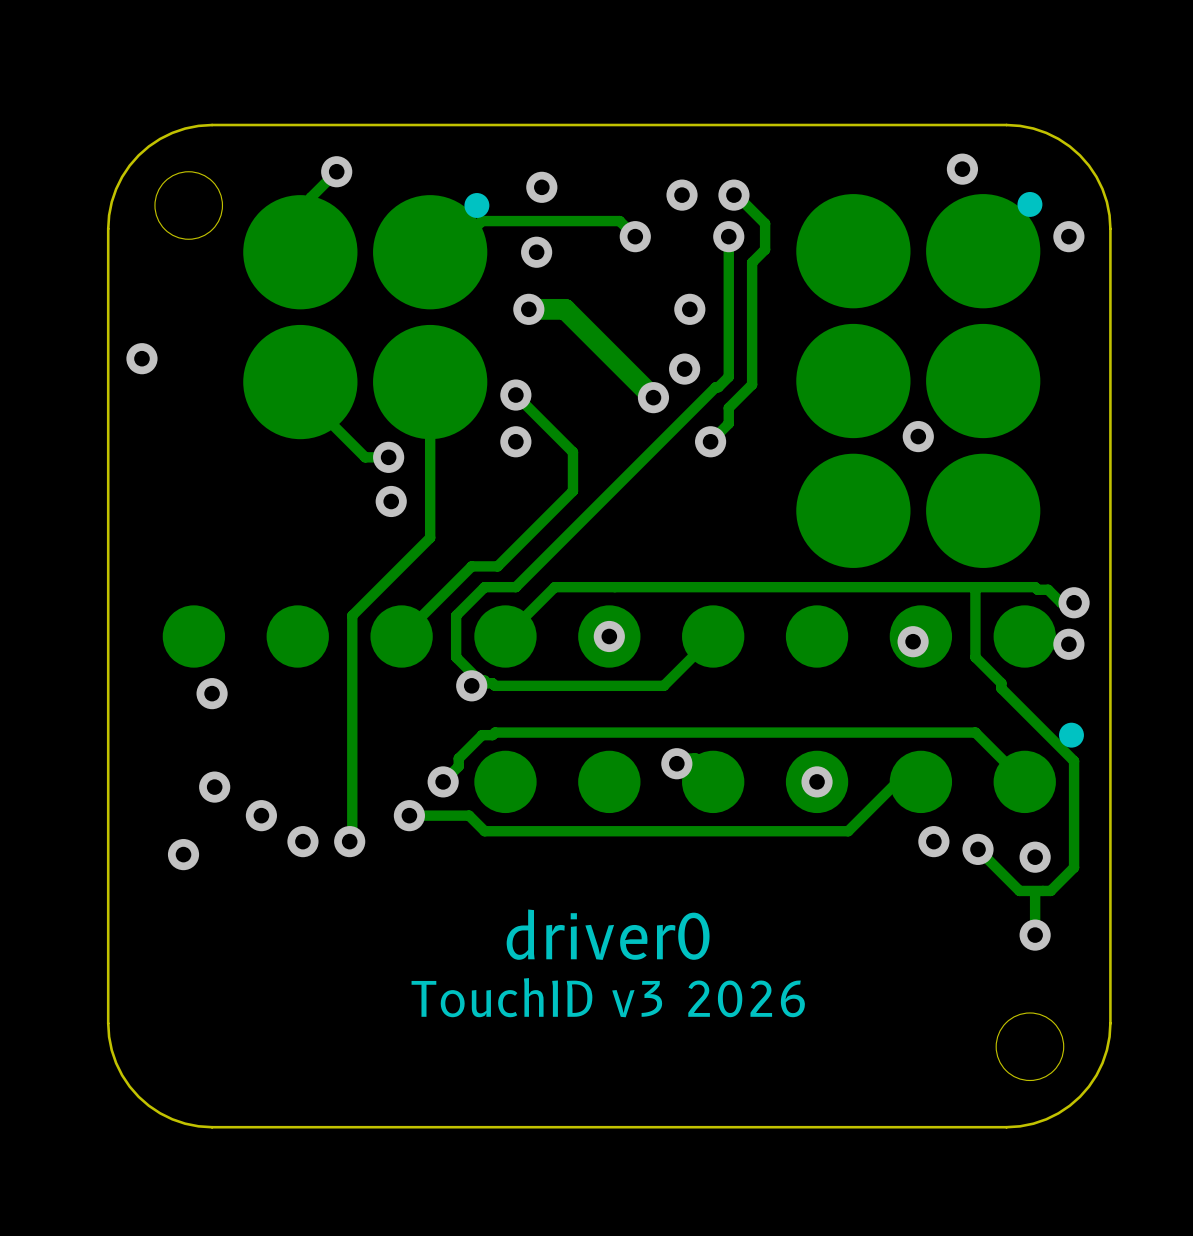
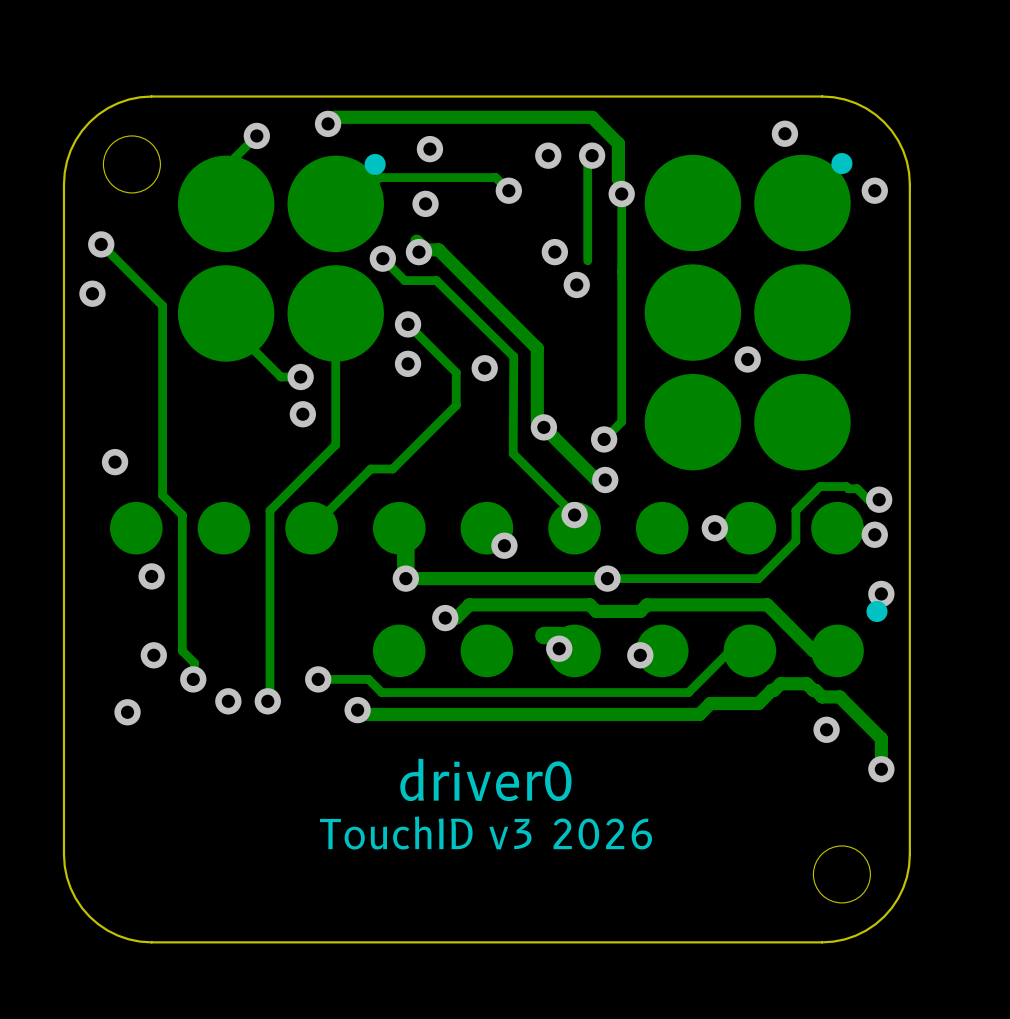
via: none -> (328, 123)
track: (736, 195) (765, 223) -> (328, 123) (334, 117) (592, 117) (618, 143) (618, 179)
via position: (728, 236) -> (621, 194)
track: (765, 236) (765, 249) (752, 262) (752, 384) (728, 408) (728, 423) (710, 441) -> none
track: none -> (621, 194) (621, 421) (604, 439)
track: none -> (416, 241) (425, 249) (438, 249) (537, 348) (537, 420) (596, 479) (605, 479)
track: none -> (101, 244) (162, 305) (162, 495) (182, 515) (182, 650) (194, 662) (194, 679)
via: none -> (101, 244)
track: (528, 309) (565, 309) (653, 397) -> none
via: none -> (382, 258)
track: (728, 319) (728, 376) (718, 387) (715, 387) (515, 587) (484, 587) (456, 615) (456, 657) (479, 680) (484, 680) (495, 685) (663, 685) (713, 636) -> (382, 258) (404, 280) (436, 280) (513, 356) (513, 453) (574, 515) (574, 528)
via position: (684, 369) -> (576, 284)
via: (653, 397) -> none
via: (710, 441) -> none
via: none -> (484, 368)
via: none -> (543, 427)
via: none -> (604, 439)
via: none -> (115, 462)
via: none -> (605, 479)
track: (975, 587) (975, 615) -> (820, 486) (795, 510)
track: (1003, 587) (554, 587) (505, 636) -> (795, 541) (758, 578) (405, 578) (405, 534) (399, 528)
via: none -> (574, 515)
via position: (609, 636) -> (504, 545)
via position: (913, 641) -> (714, 528)
track: (975, 652) (975, 657) (1001, 683) (1001, 688) (1074, 761) (1074, 867) (1050, 890) (1019, 890) (978, 849) -> none
via position: (471, 685) -> (405, 578)
via: none -> (607, 578)
via: none -> (881, 593)
via: none -> (445, 618)
via position: (676, 763) -> (559, 648)
via: (443, 781) -> none
via position: (817, 781) -> (640, 655)
track: (1024, 781) (975, 732) (495, 732) (492, 735) (482, 735) (458, 758) (458, 766) (443, 781) -> (837, 650) (813, 650) (767, 604) (646, 604) (640, 611) (596, 611) (589, 604) (469, 604) (456, 618) (445, 618)
via: (933, 841) -> none
via: (978, 849) -> none
track: none -> (357, 710) (362, 714) (699, 714) (710, 703) (758, 703) (780, 683) (806, 683) (822, 696) (839, 696) (881, 738) (881, 769)
via: none -> (357, 710)
via position: (1035, 857) -> (826, 729)
track: (1035, 893) (1035, 935) -> (587, 155) (587, 190)
via: none -> (881, 769)
via: (1035, 935) -> none

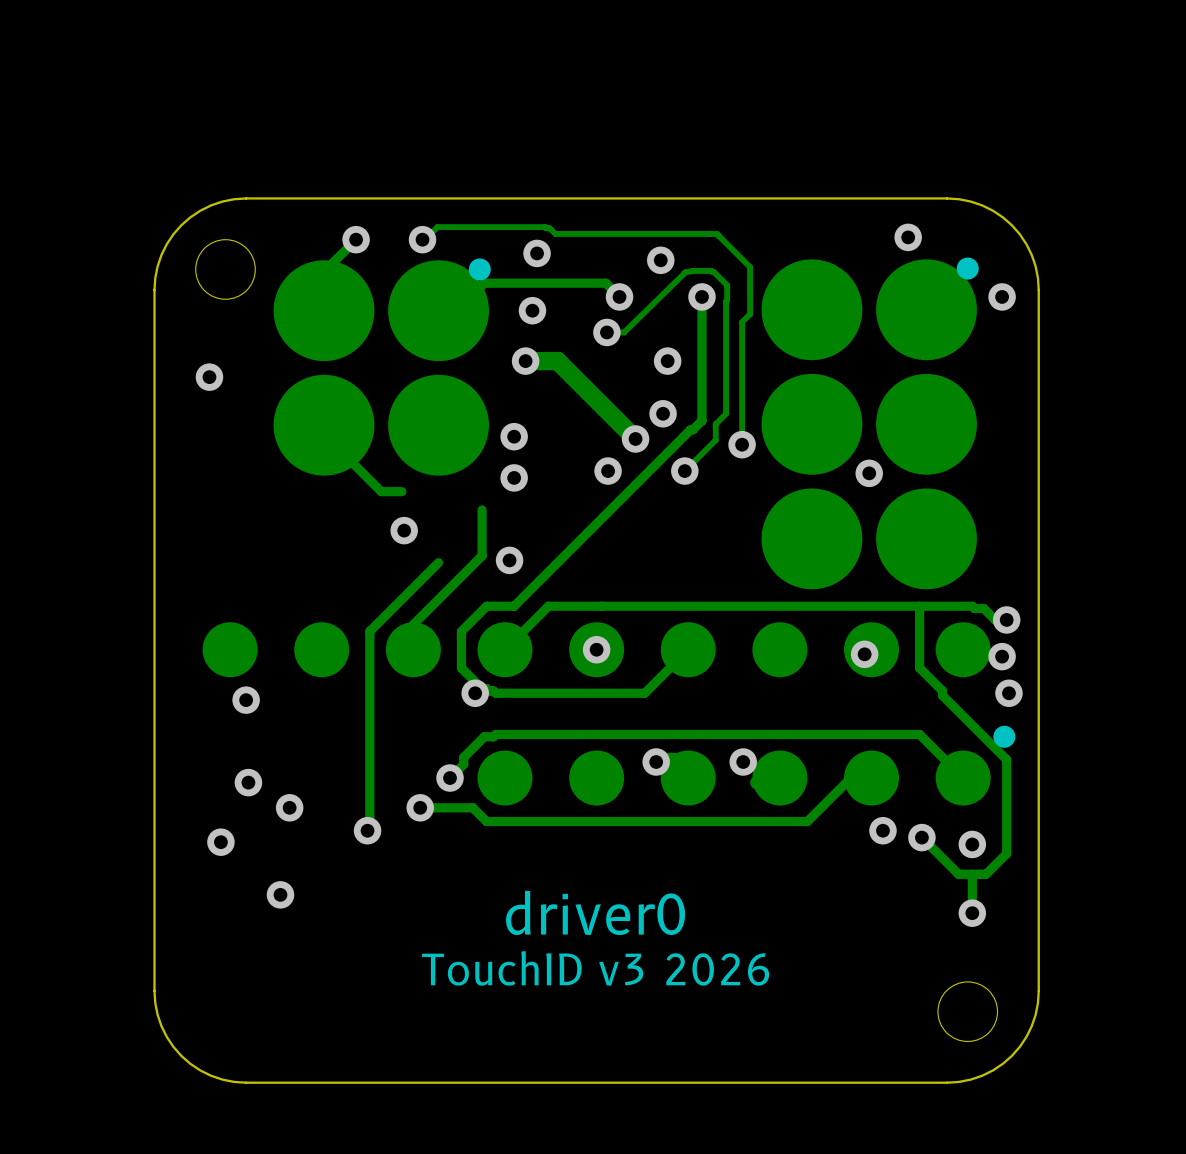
track: (328, 123) (334, 117) (592, 117) (618, 143) (618, 190) -> none
via position: (328, 123) -> (422, 239)
track: none -> (424, 239) (437, 227) (545, 227) (549, 228) (555, 233) (716, 233) (750, 267) (750, 314) (742, 322) (742, 444)
track: (587, 155) (587, 190) -> none
via: (592, 155) -> none
via: none -> (702, 296)
track: (621, 194) (621, 421) (604, 439) -> none
via: (621, 194) -> none
track: none -> (606, 332) (624, 332) (685, 272) (711, 270) (727, 285) (726, 413) (715, 424) (715, 440) (684, 471)
via: none -> (606, 332)
track: (416, 241) (425, 249) (438, 249) (537, 348) (537, 420) (596, 479) (605, 479) -> none
track: (101, 244) (162, 305) (162, 495) (182, 515) (182, 650) (194, 662) (194, 679) -> none
via: (101, 244) -> none
track: none -> (525, 361) (557, 361) (635, 438)
track: (382, 258) (404, 280) (436, 280) (513, 356) (513, 453) (574, 515) (574, 528) -> (702, 370) (702, 420) (690, 429) (514, 606) (486, 606) (461, 631) (461, 668) (482, 688) (495, 693) (644, 693) (688, 649)
via: (382, 258) -> none
via: none -> (209, 377)
via position: (576, 284) -> (663, 413)
via: (92, 293) -> none
track: (335, 313) (335, 444) -> none
track: (408, 324) (456, 372) (456, 405) (392, 469) (370, 469) (311, 528) -> (482, 510) (482, 555) (413, 624) (413, 649)
via: none -> (635, 438)
via: none -> (742, 444)
via: none -> (684, 471)
via position: (484, 368) -> (608, 471)
via: (300, 377) -> none
via: (543, 427) -> none
via: (604, 439) -> none
via: none -> (509, 560)
via: (115, 462) -> none
via: (605, 479) -> none
track: (820, 486) (795, 510) -> (919, 606) (919, 631)
via: (574, 515) -> none
track: (399, 528) (405, 534) (405, 578) (758, 578) (795, 541) -> (504, 649) (548, 606) (944, 606)
via position: (714, 528) -> (864, 654)
track: none -> (919, 663) (919, 668) (942, 690) (942, 695) (1006, 759) (1006, 853) (986, 874) (958, 874) (921, 837)
via position: (504, 545) -> (596, 649)
via position: (405, 578) -> (475, 693)
via: (607, 578) -> none
via position: (881, 593) -> (1008, 693)
track: (445, 618) (456, 618) (469, 604) (589, 604) (596, 611) (640, 611) (646, 604) (767, 604) (813, 650) (837, 650) -> (450, 778) (463, 764) (463, 757) (484, 736) (493, 736) (495, 734) (919, 734) (963, 778)
via: (445, 618) -> none
via position: (559, 648) -> (656, 761)
via: none -> (450, 778)
via position: (640, 655) -> (743, 761)
via: (228, 701) -> none
via: none -> (882, 830)
via: none -> (921, 837)
track: (357, 710) (362, 714) (699, 714) (710, 703) (758, 703) (780, 683) (806, 683) (822, 696) (839, 696) (881, 738) (881, 769) -> none
via: (357, 710) -> none
via position: (826, 729) -> (972, 844)
track: none -> (972, 874) (972, 913)
via: none -> (280, 894)
via: (881, 769) -> none
via: none -> (972, 913)

